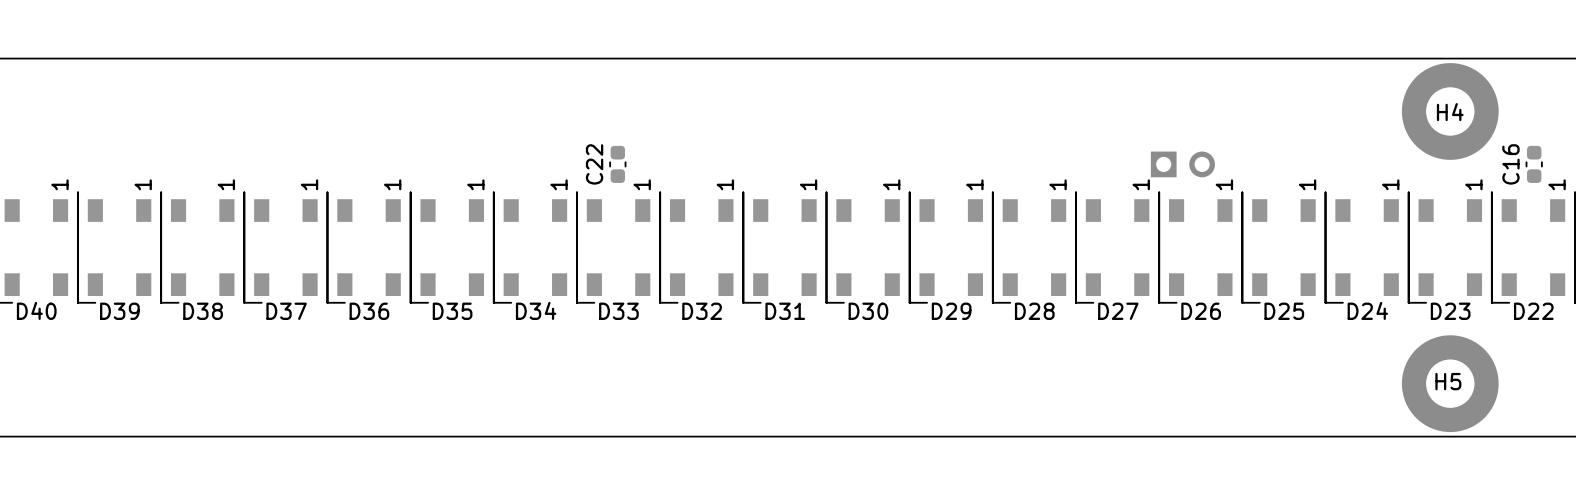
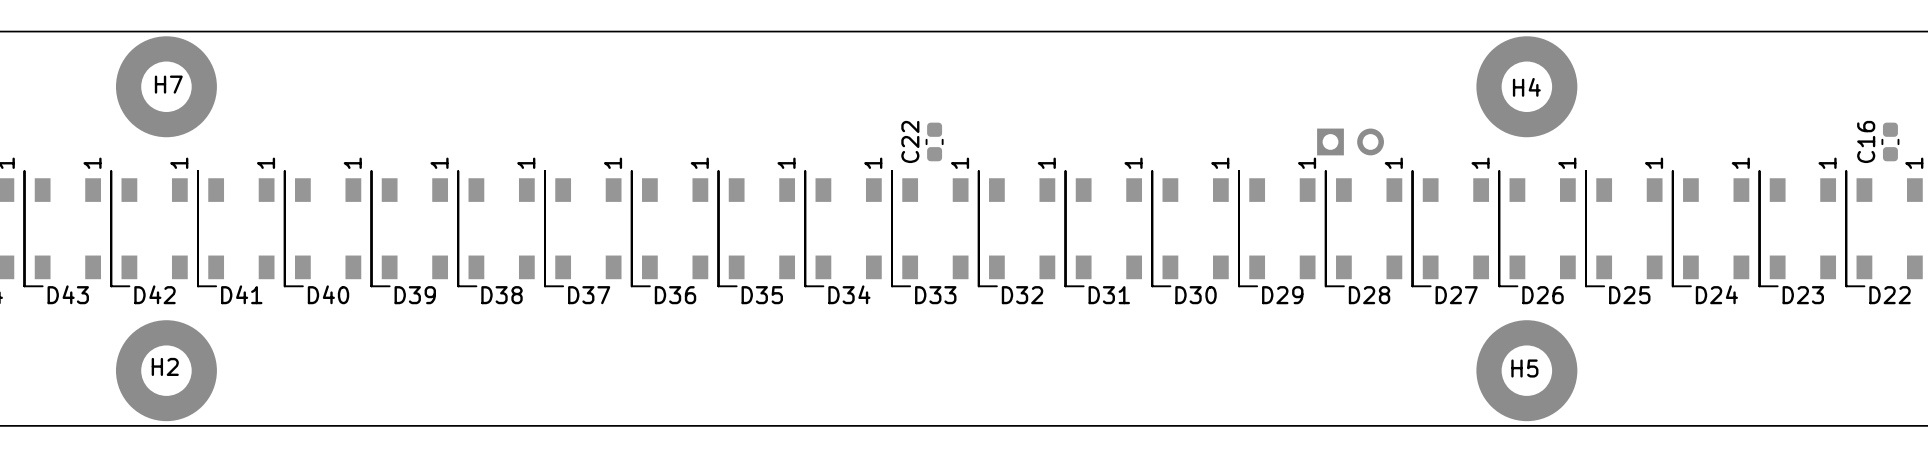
H4 position: (1450, 111) -> (1526, 86)
part position: (1182, 164) -> (1350, 141)
H5 position: (1450, 383) -> (1526, 370)

